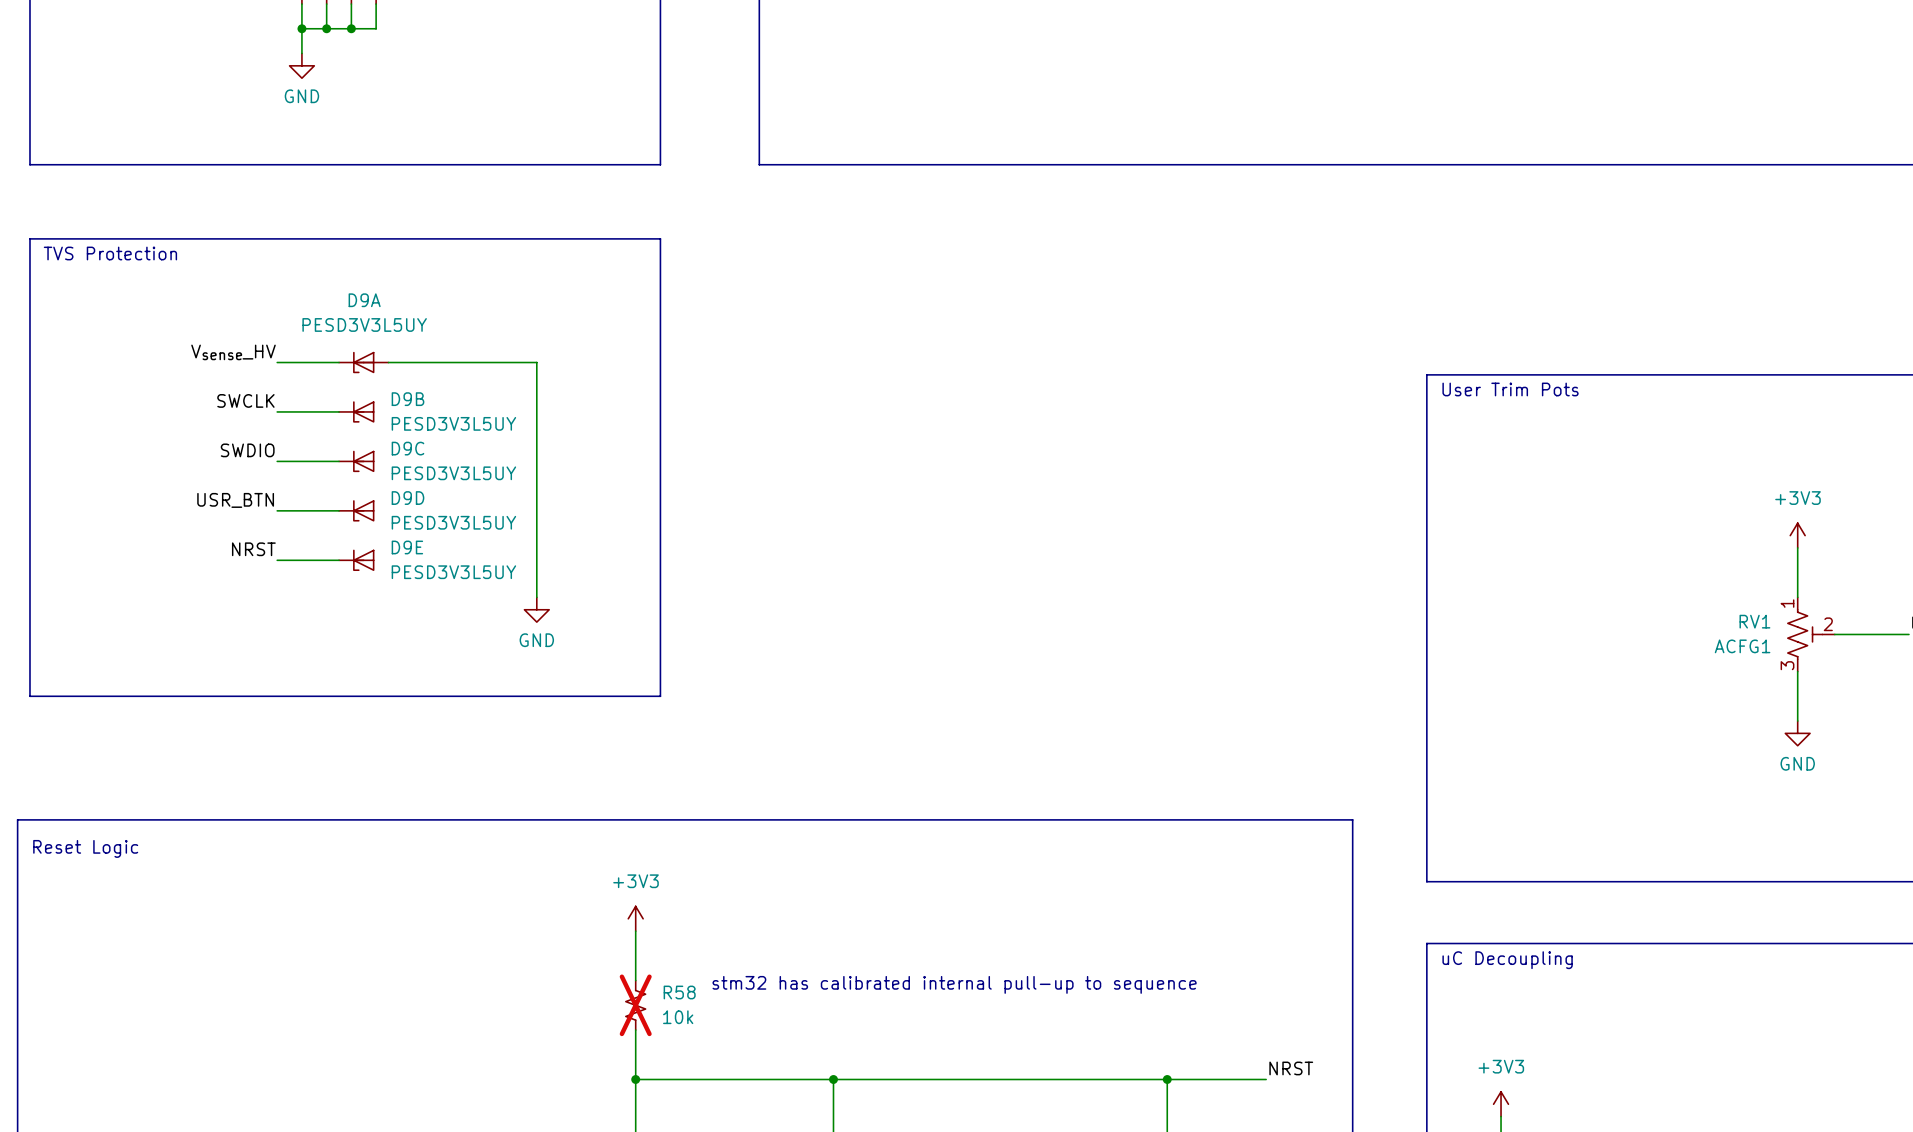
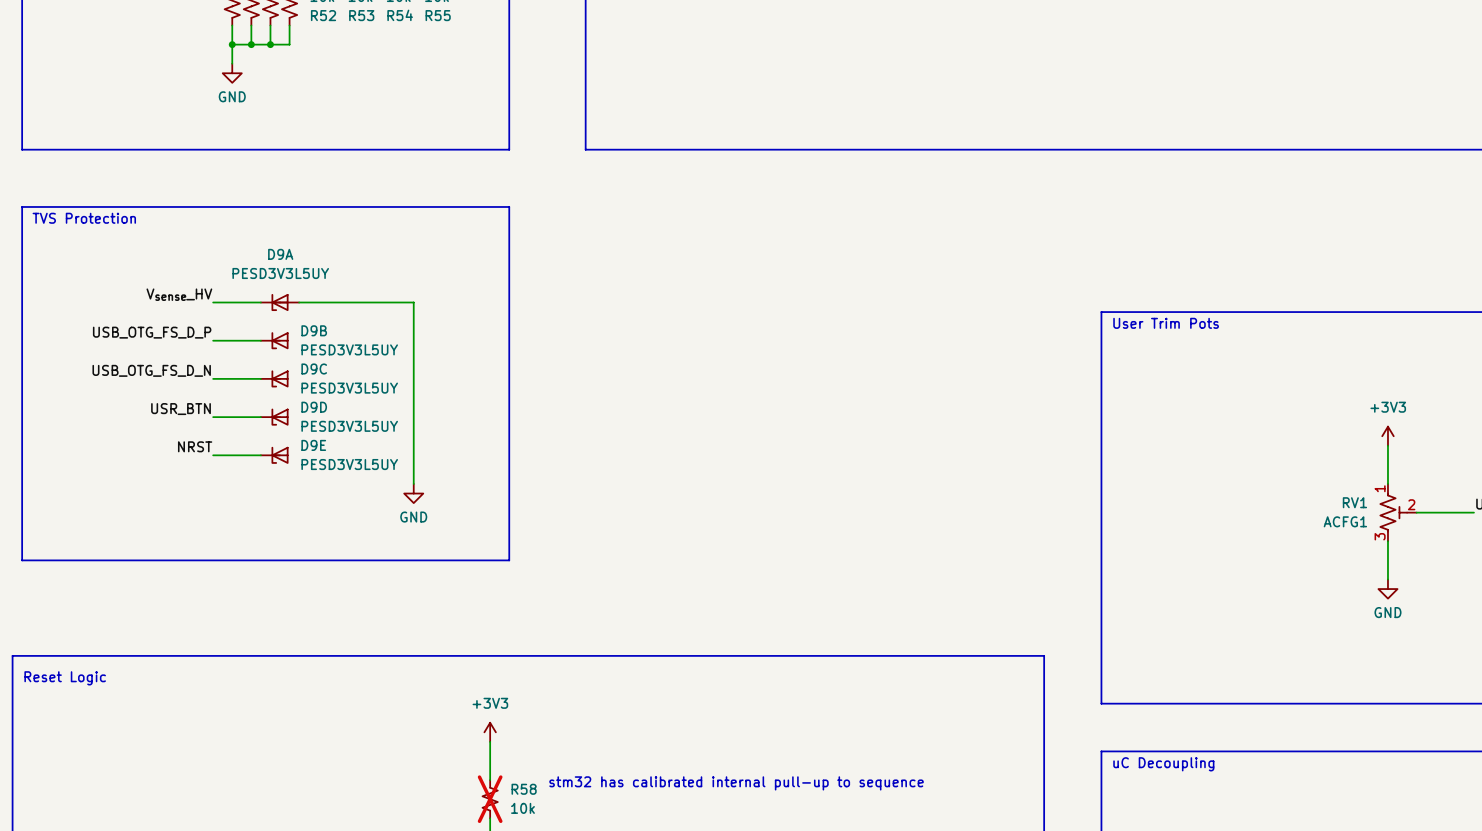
label: SWCLK (245, 400) -> USB_OTG_FS_D_P (152, 332)
label: SWDIO (247, 450) -> USB_OTG_FS_D_N (151, 370)

